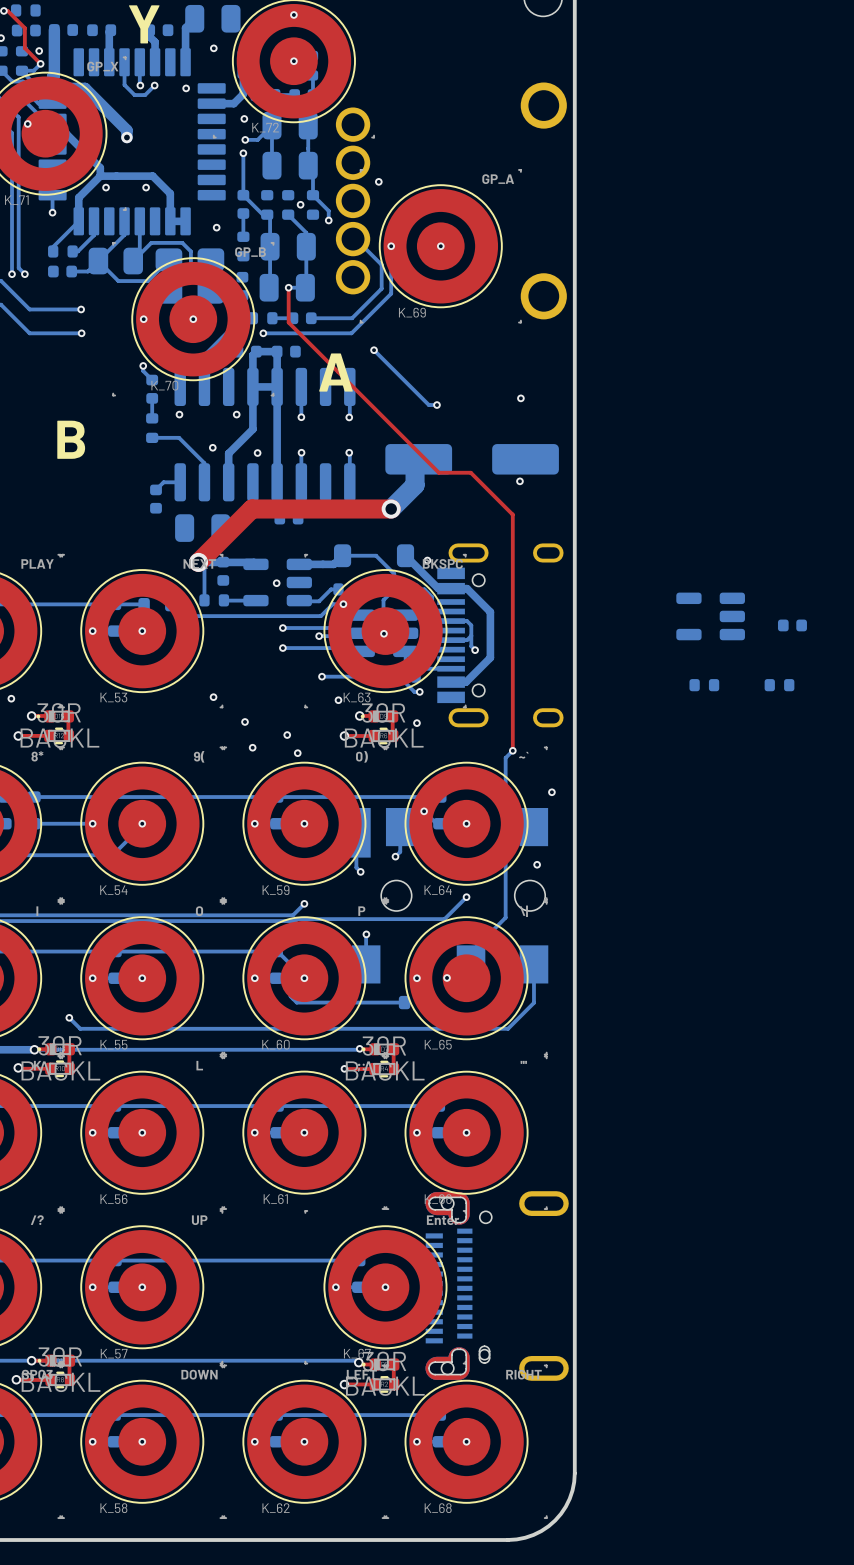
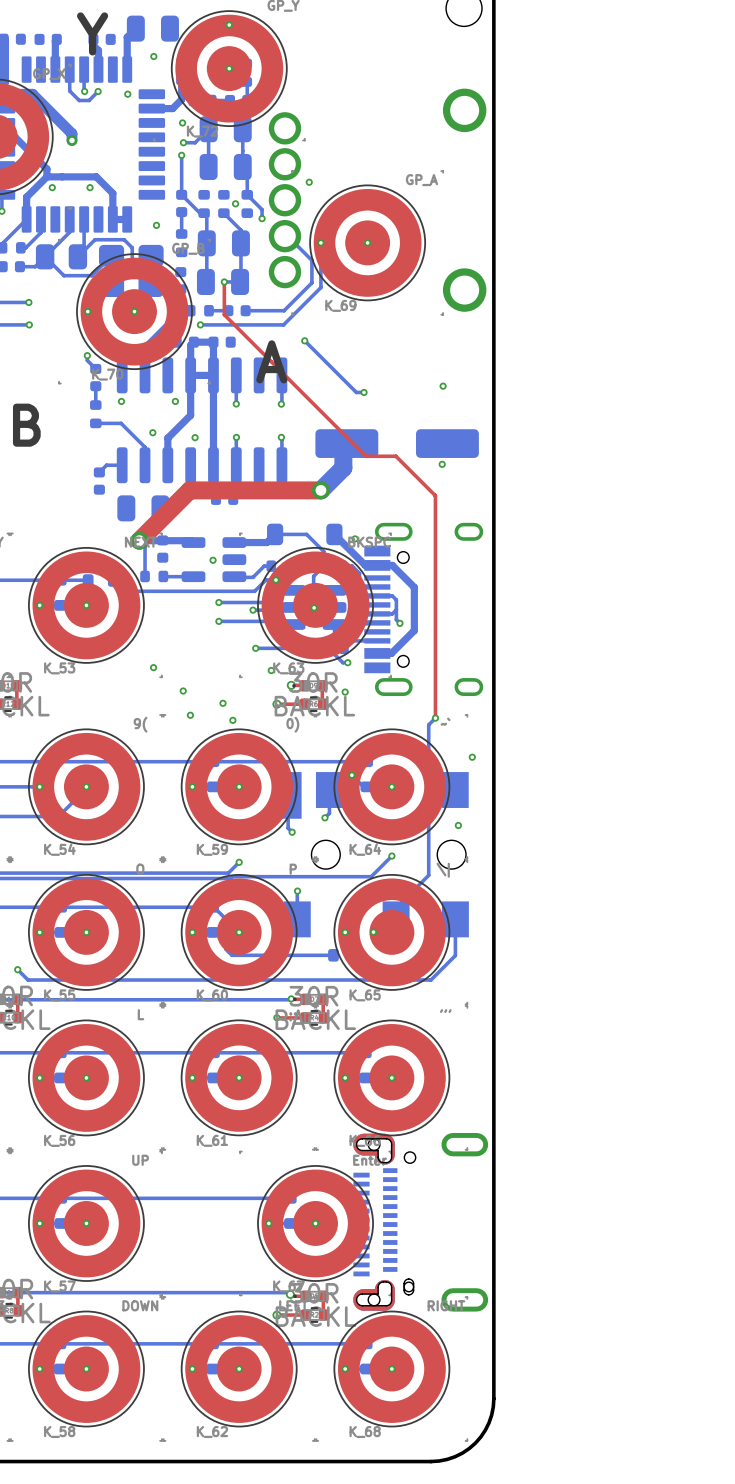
part: (710, 616) -> none
part: (792, 625) -> none
part: (704, 685) -> none
part: (779, 685) -> none

